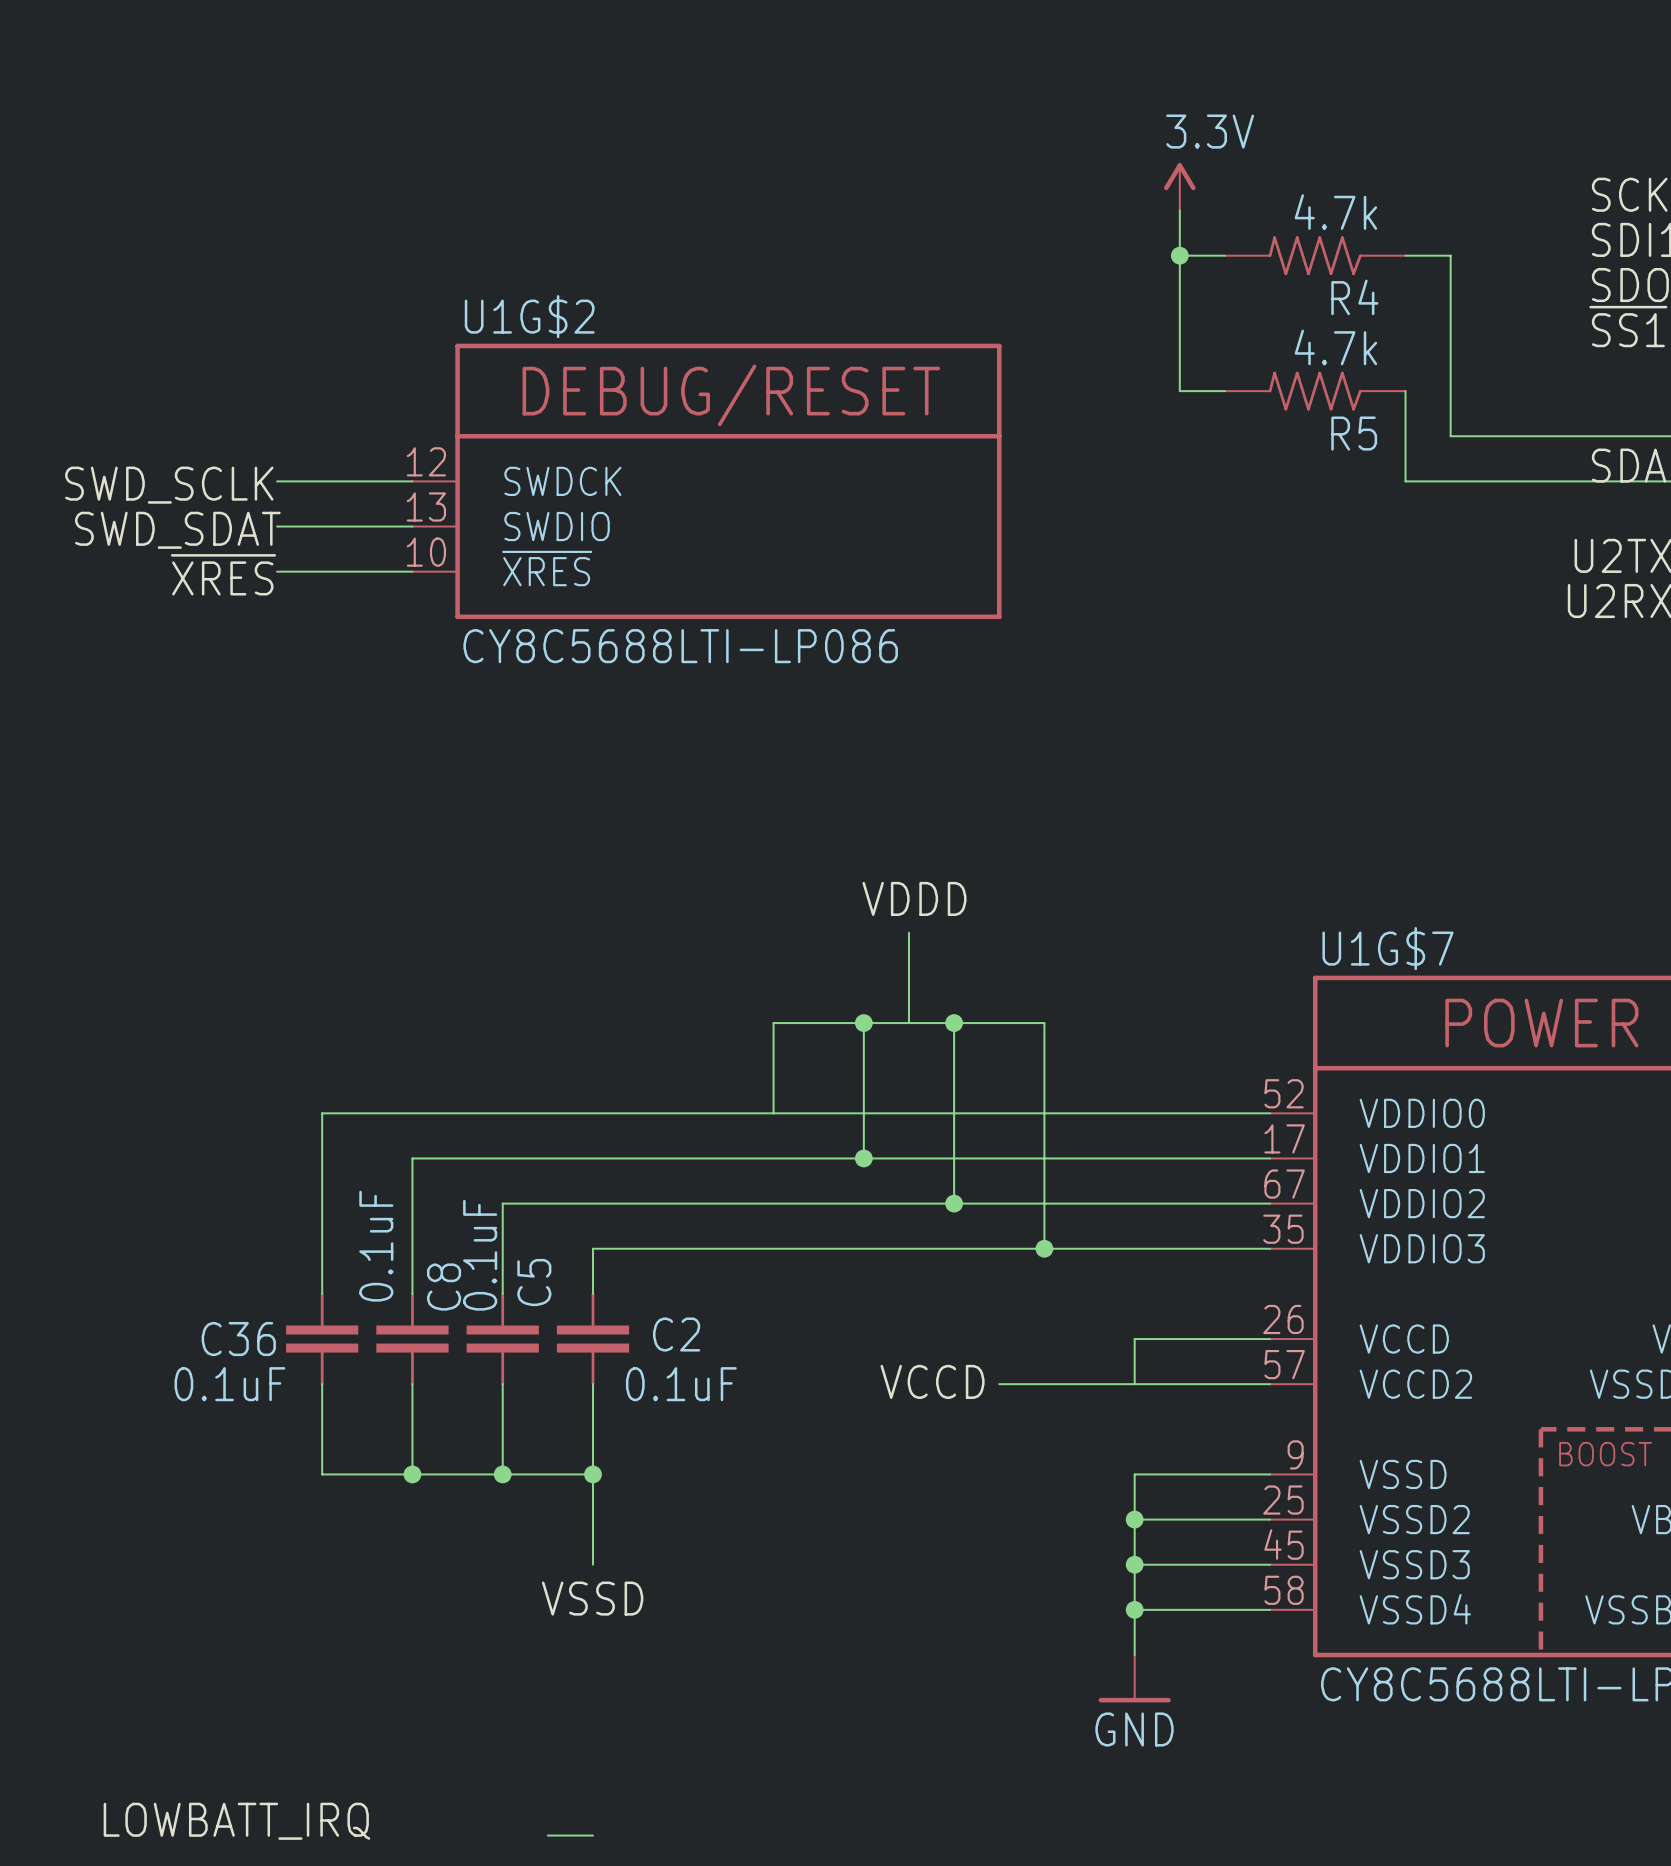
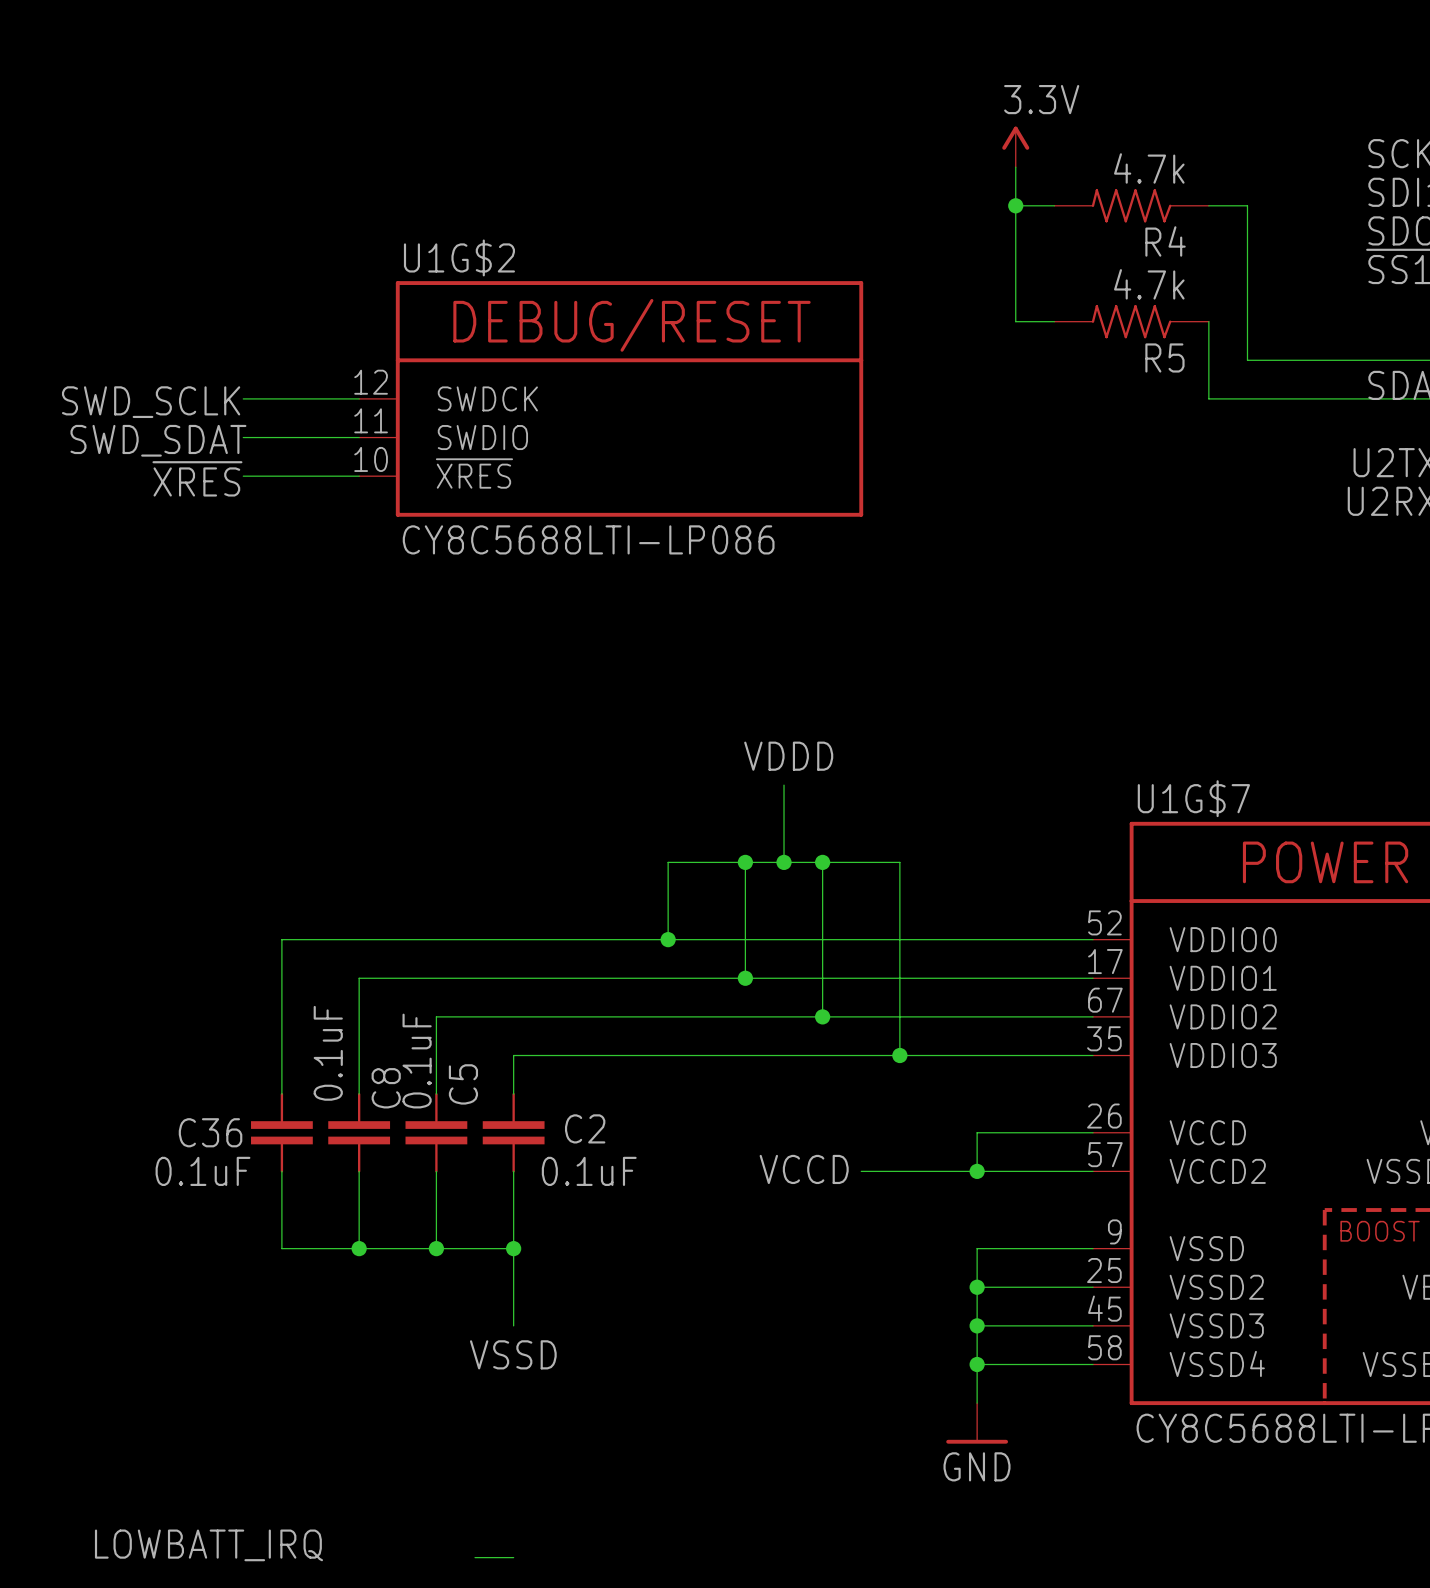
U1G$2 pin number: 13 (426, 506) -> 11 (371, 420)
junction: none -> (784, 862)
junction: none -> (668, 939)
junction: none -> (977, 1171)

